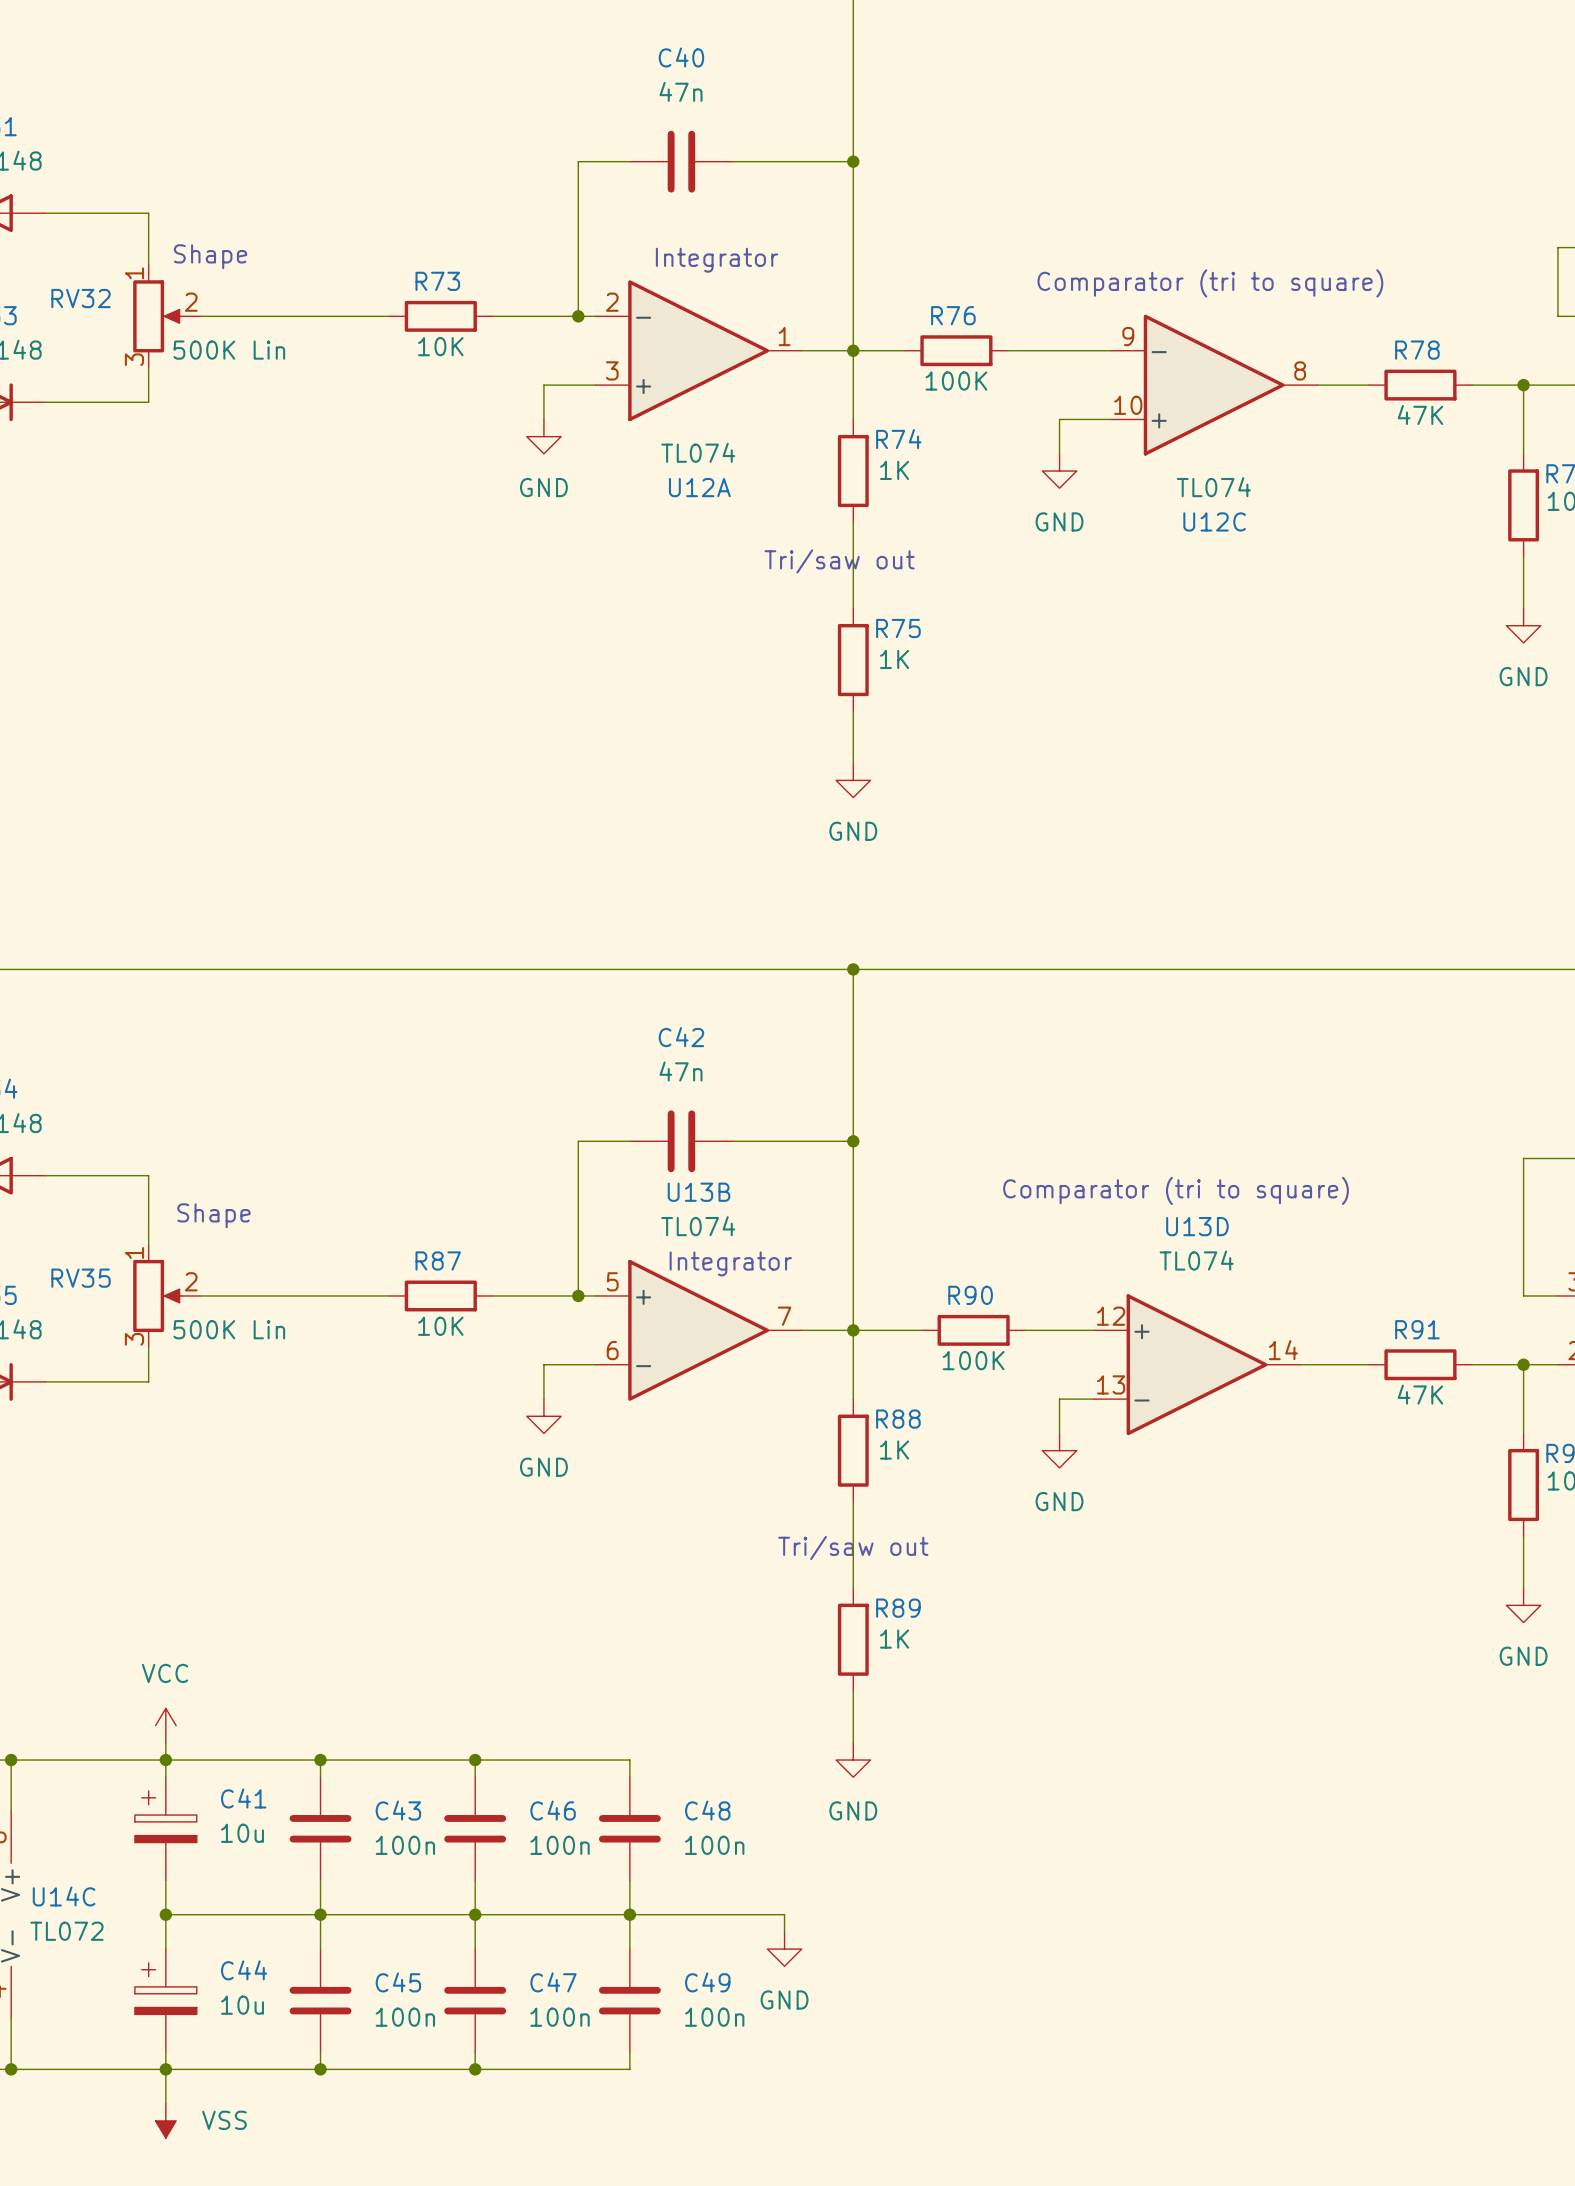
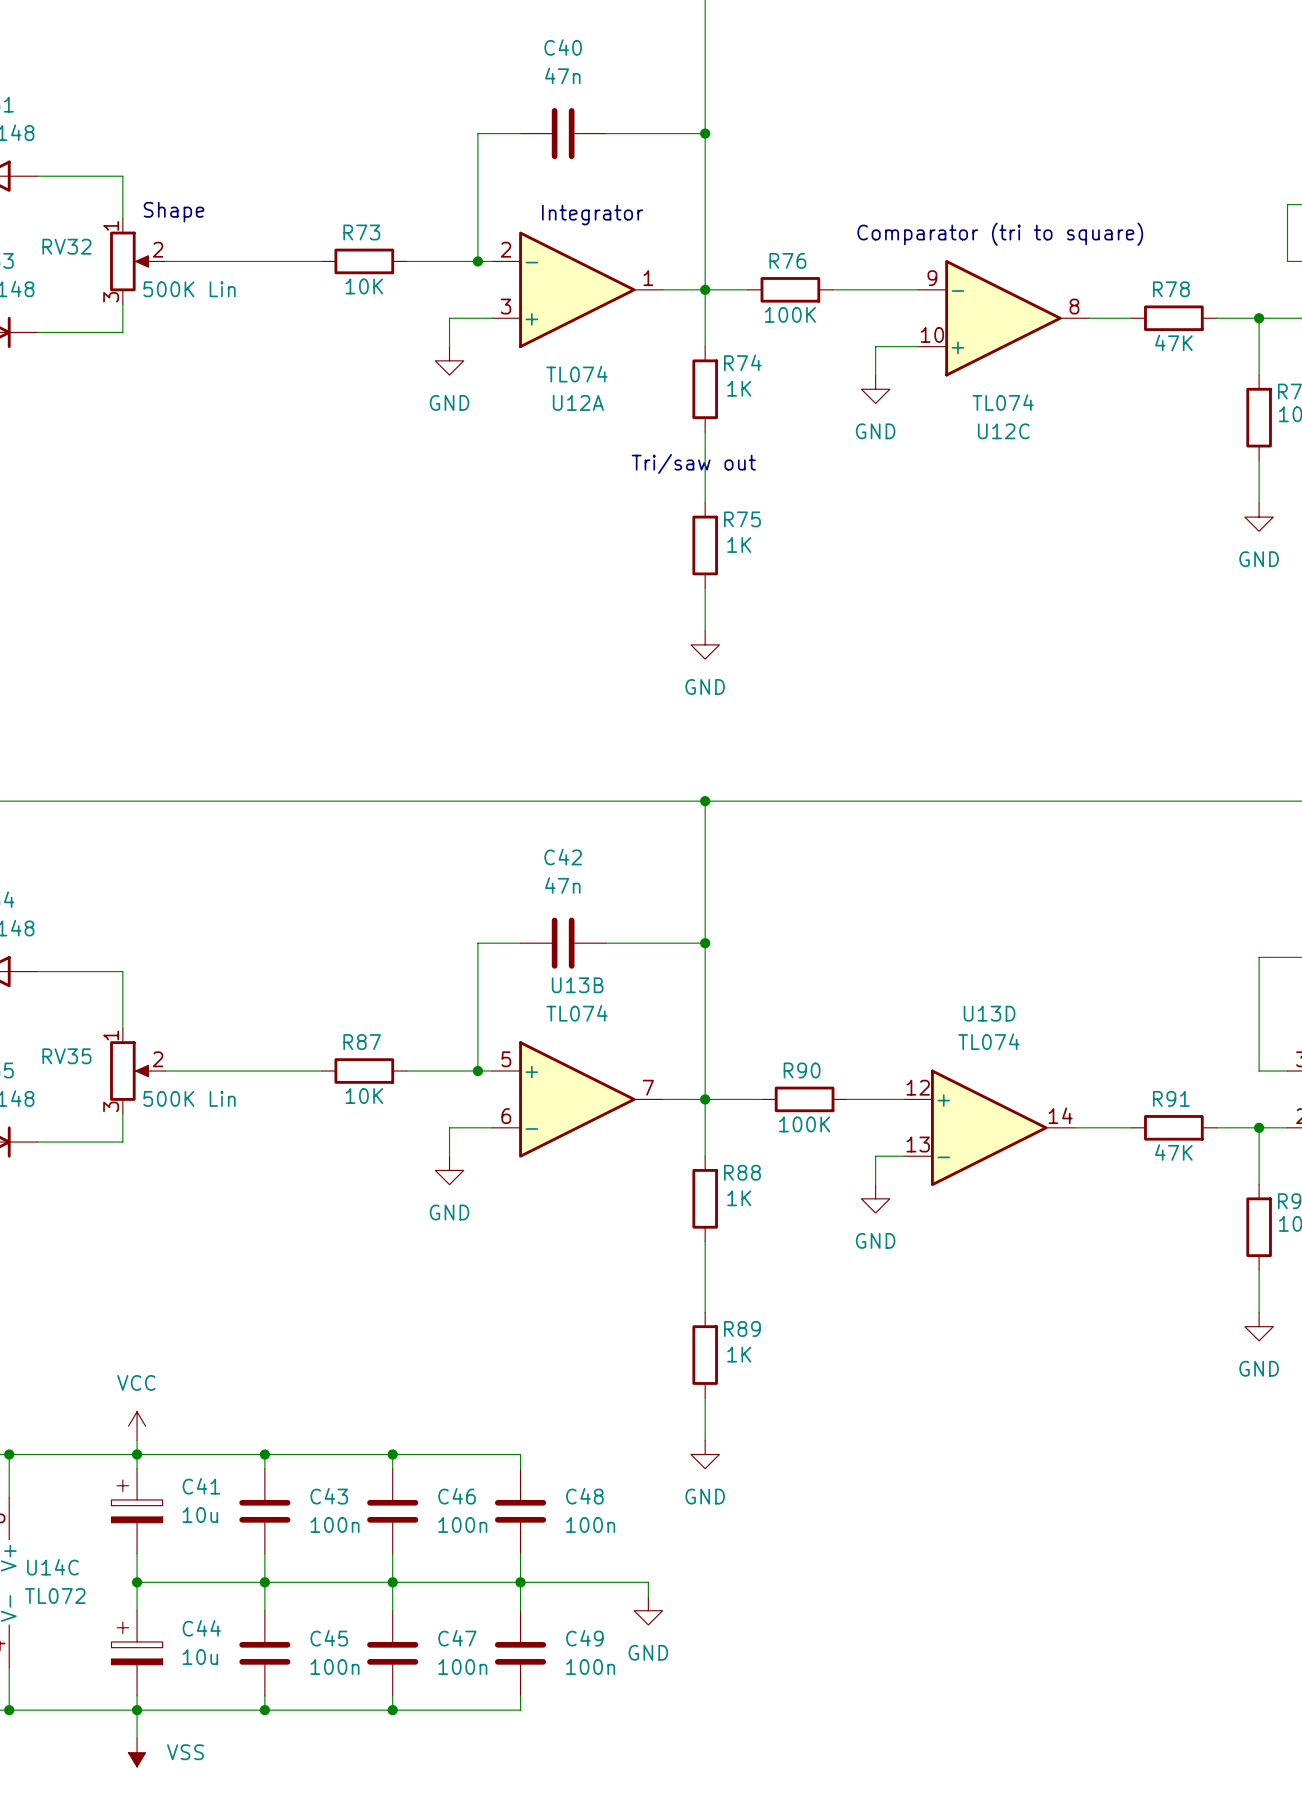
text: Comparator (tri to square) (1176, 1190) -> none
text: Shape (213, 1215) -> none
text: Integrator (730, 1263) -> none
text: Tri/saw out (853, 1547) -> none

